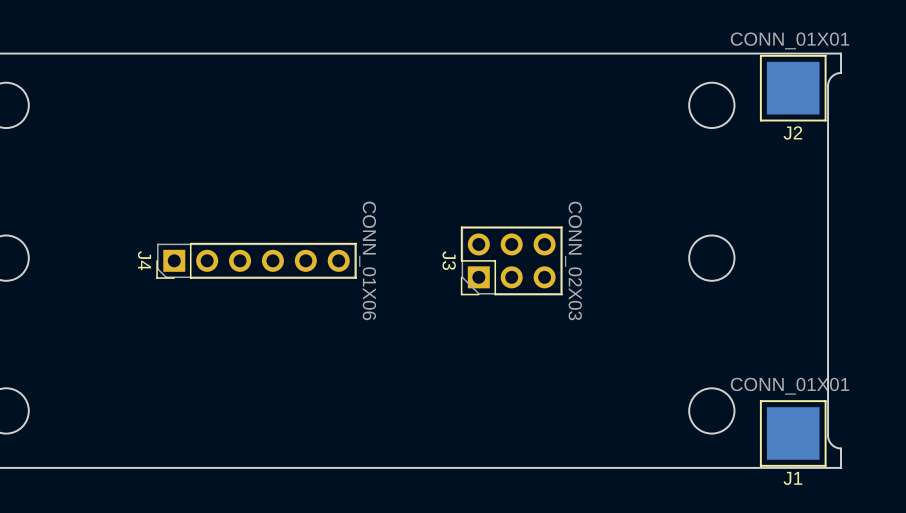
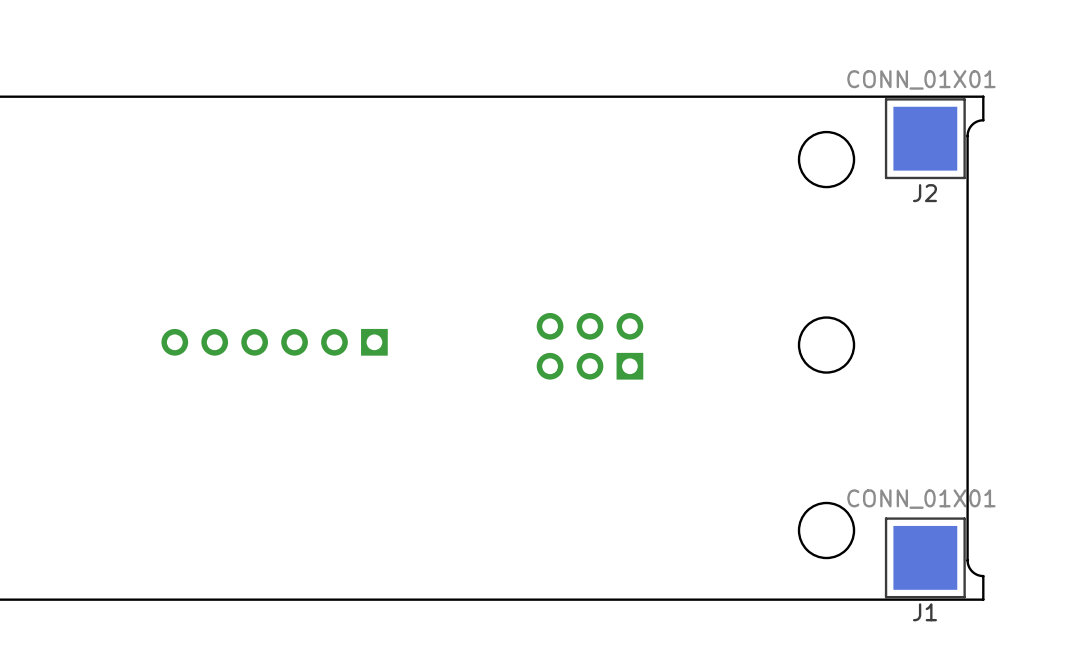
part: none -> (274, 342)
part: none -> (589, 346)
J4: CONN_01X06 (256, 260) -> none
J3: CONN_02X03 (511, 260) -> none

